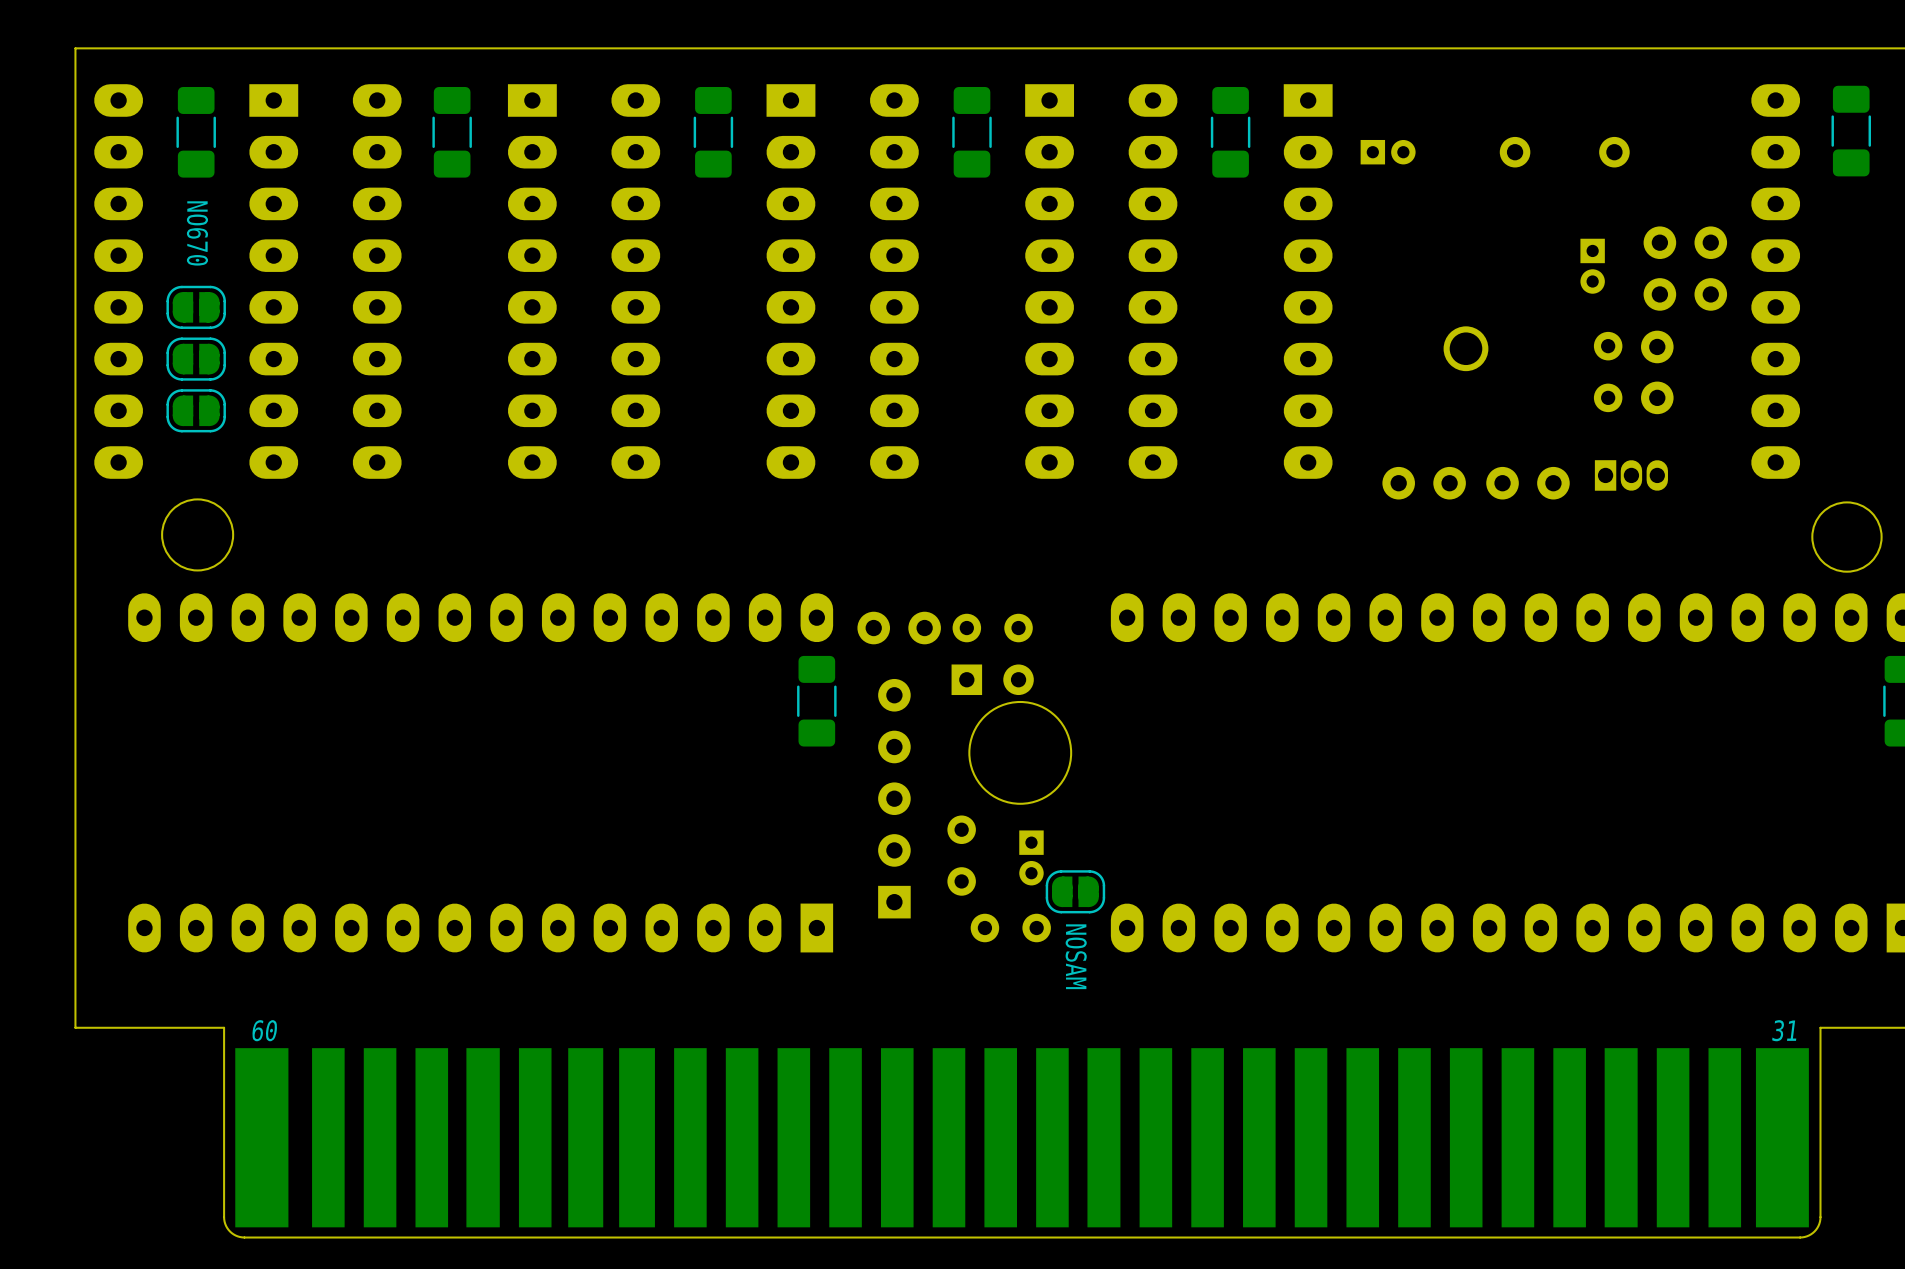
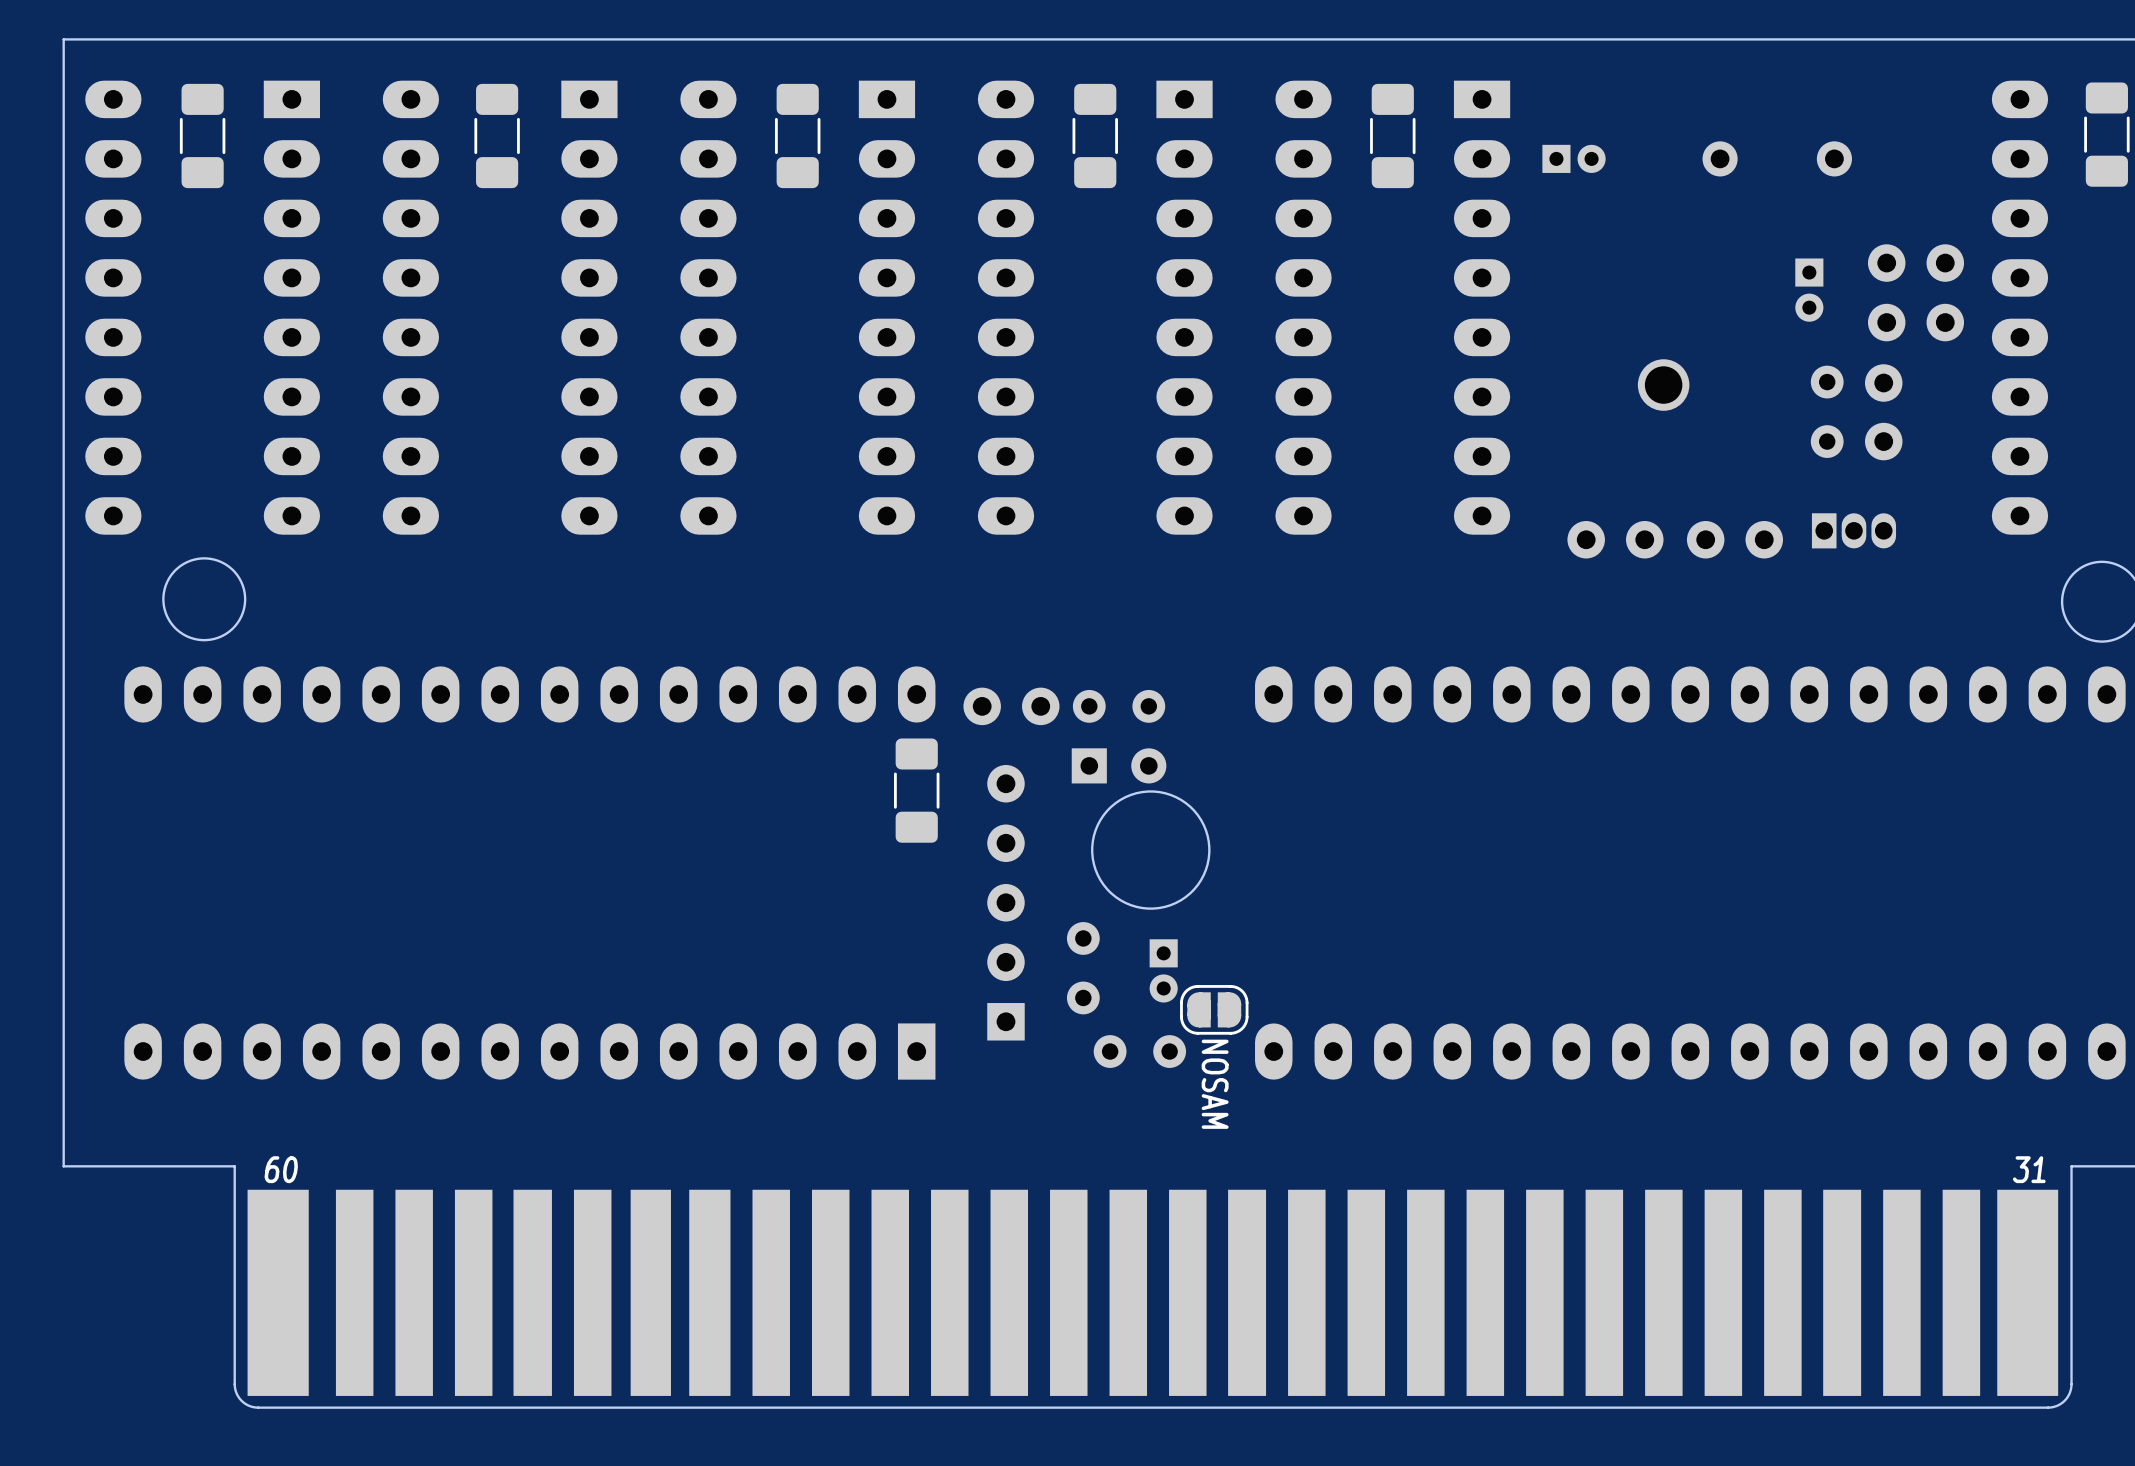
text: NO670 (197, 233) -> none
part: (196, 307) -> none
part: (196, 359) -> none
part: (196, 410) -> none

